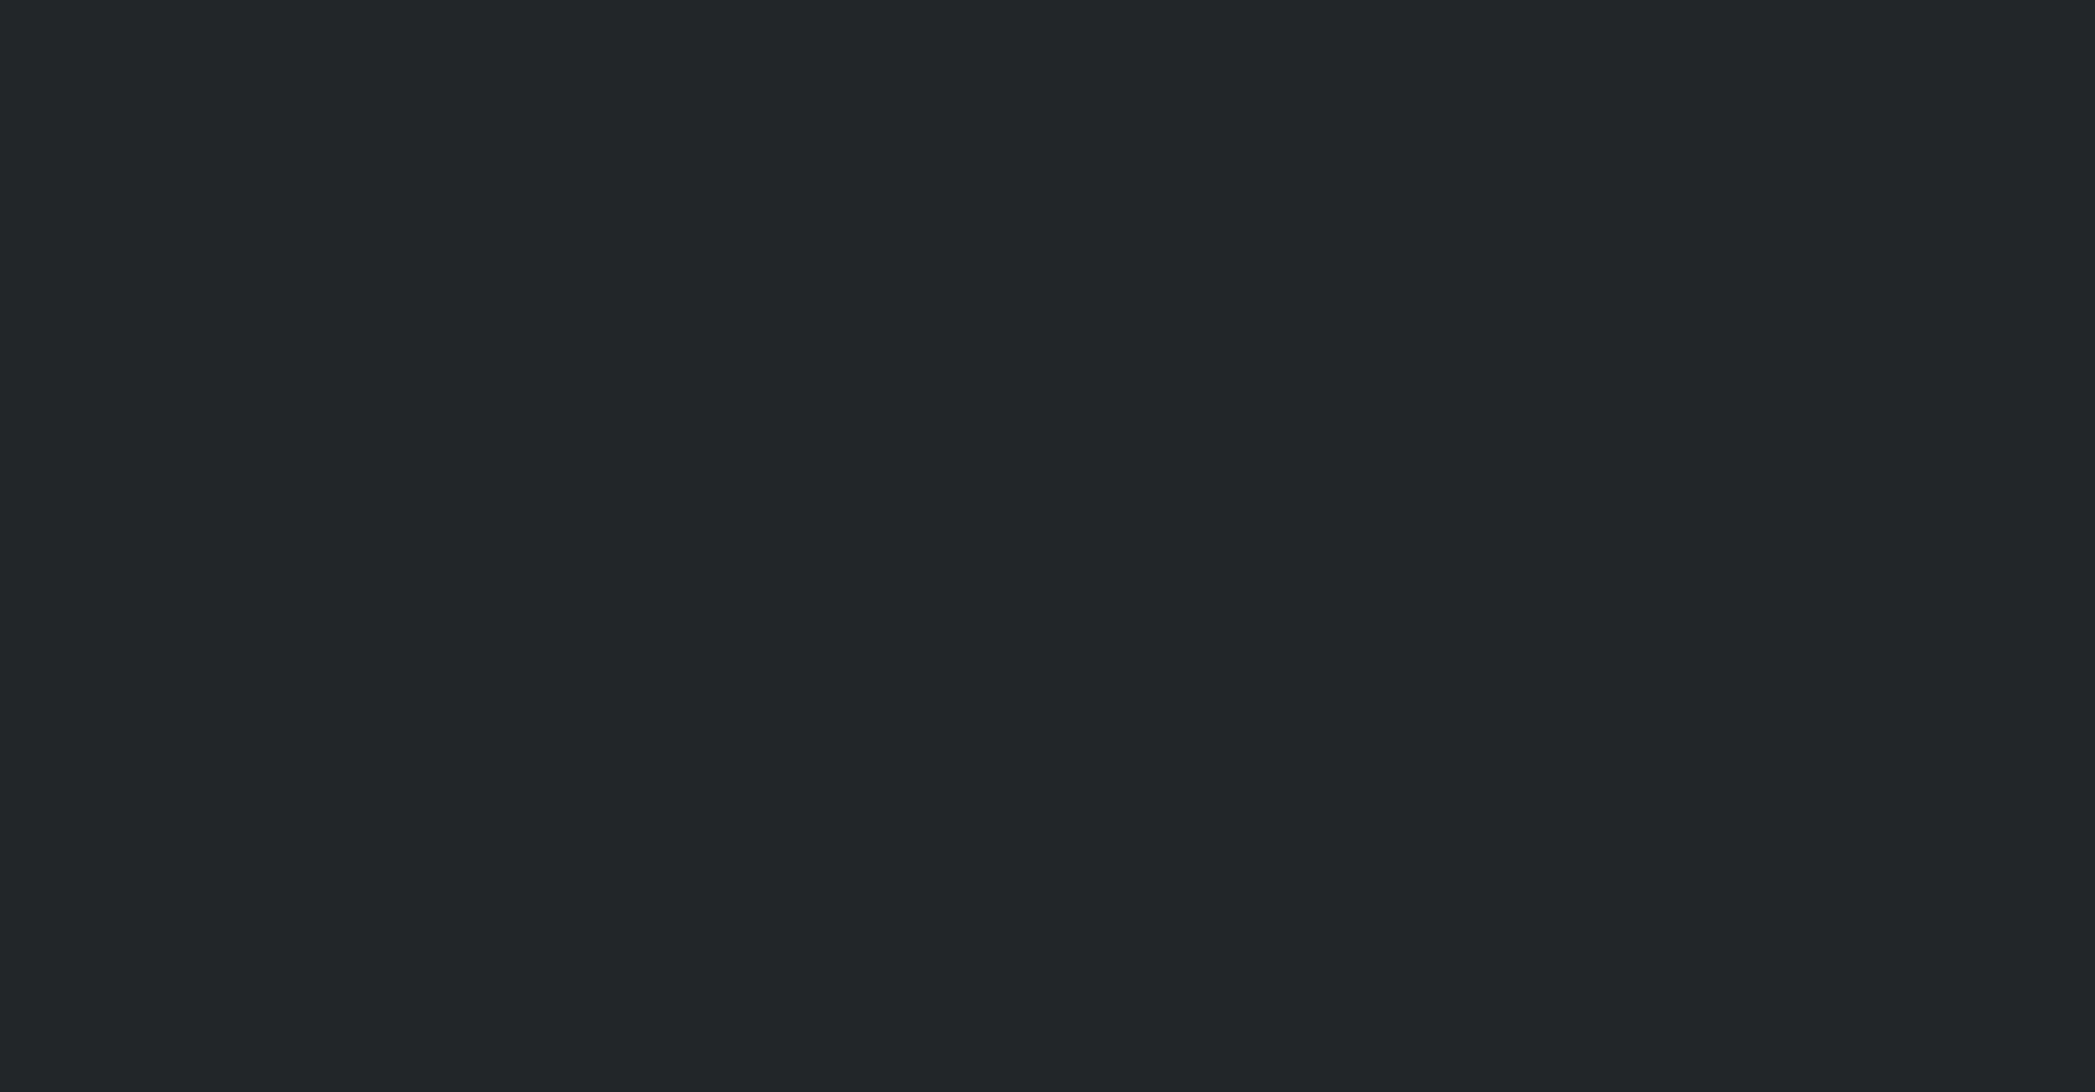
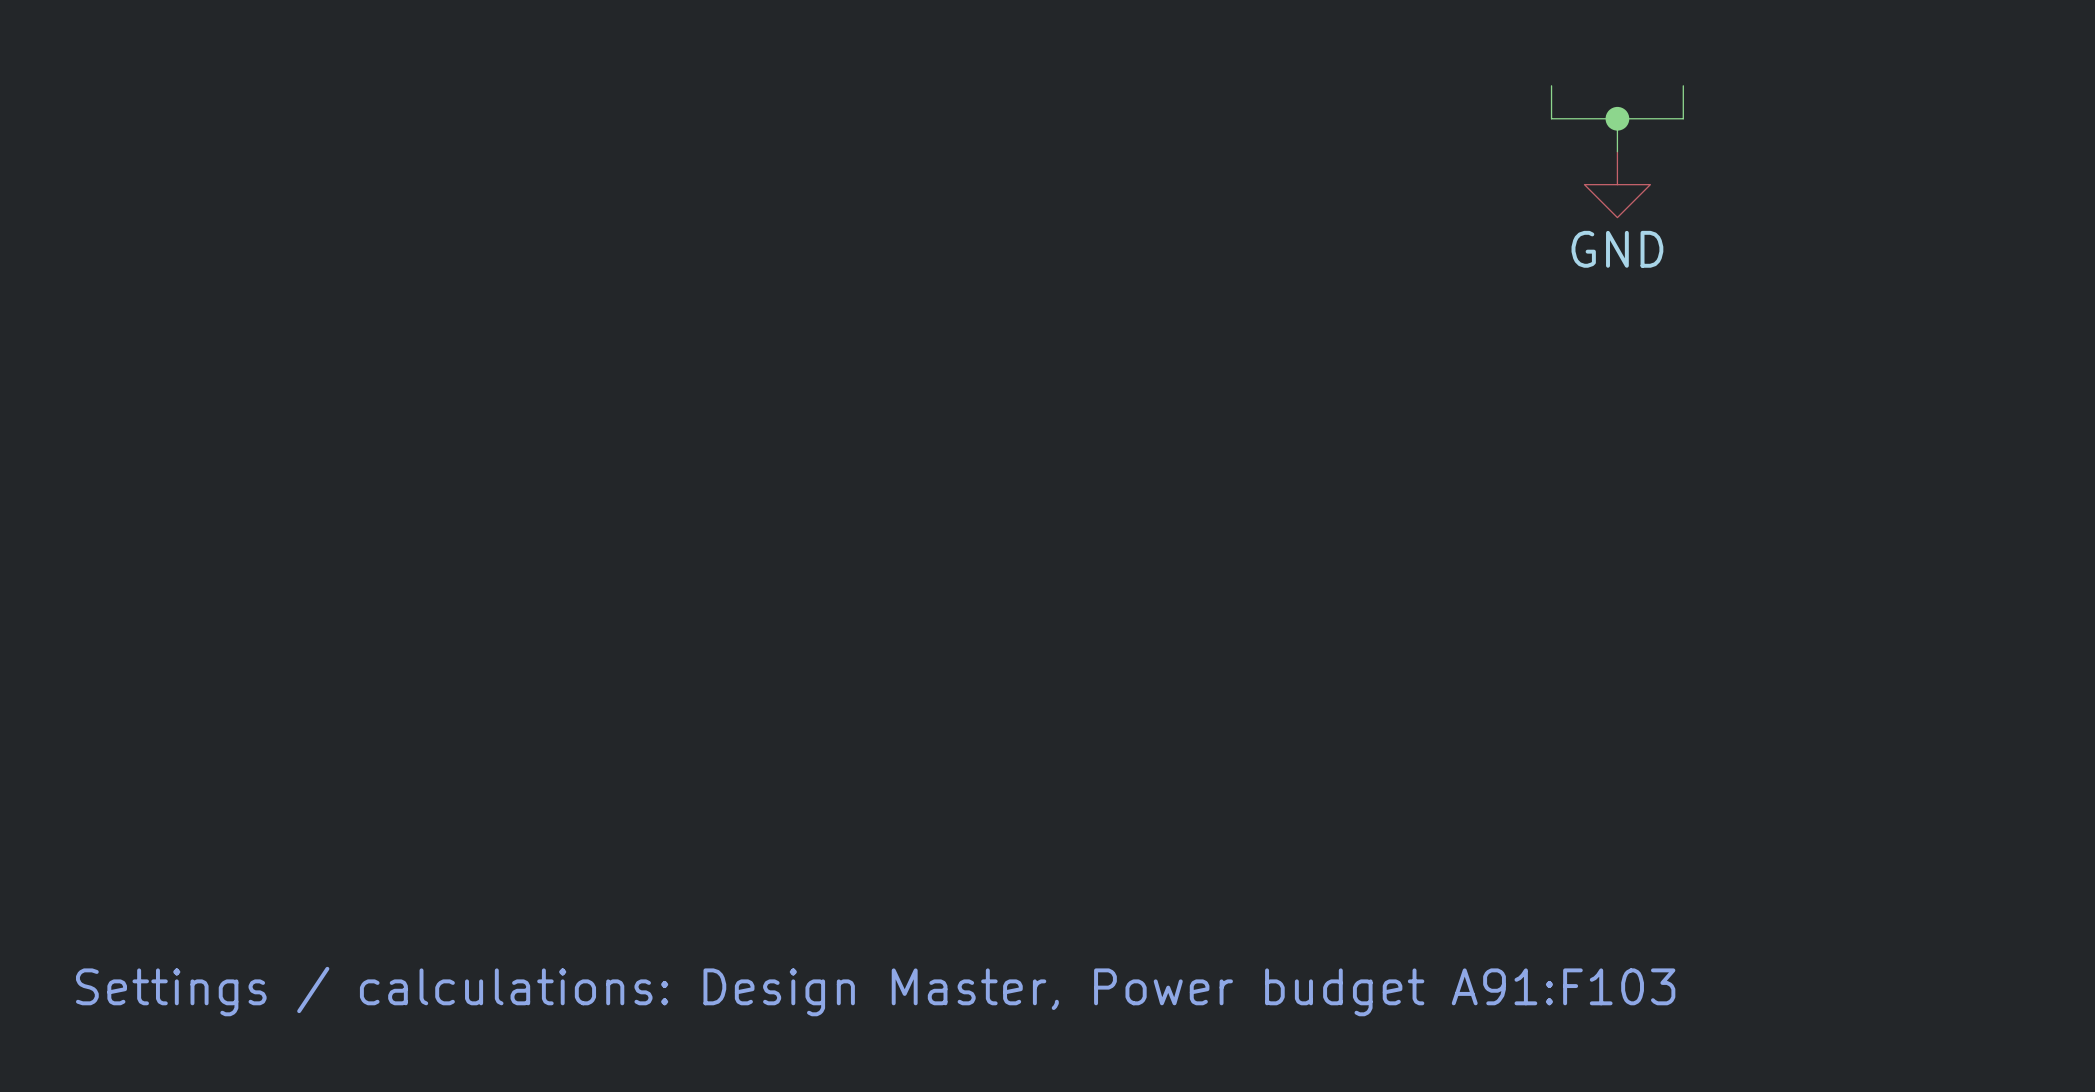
wire: none -> (1551, 85) (1551, 118) (1683, 118) (1683, 85)
wire: none -> (1617, 118) (1617, 151)
junction: none -> (1617, 118)
power symbol: none -> GND (1617, 184)
text: none -> Settings / calculations: Design Master, Power budget A91:F103 (875, 991)

